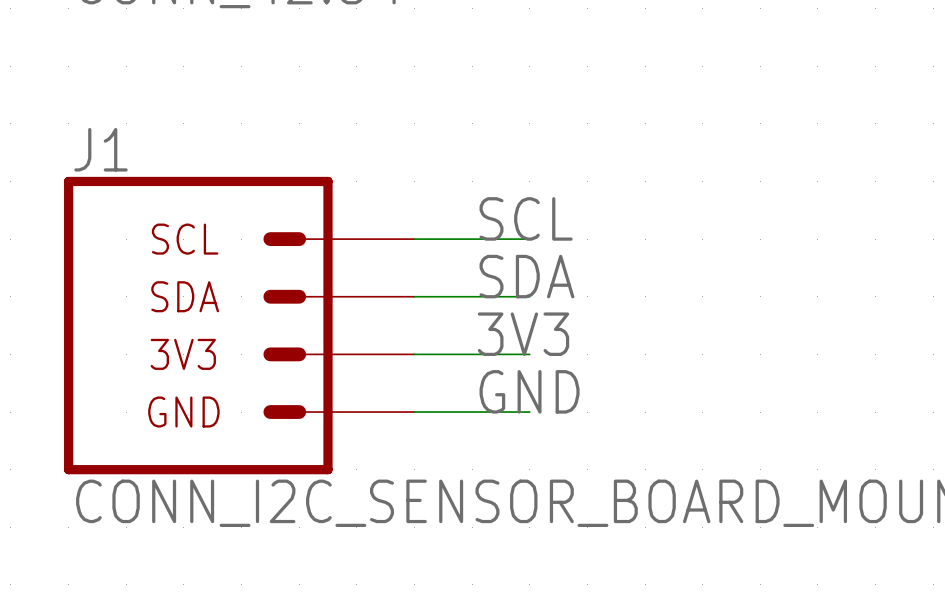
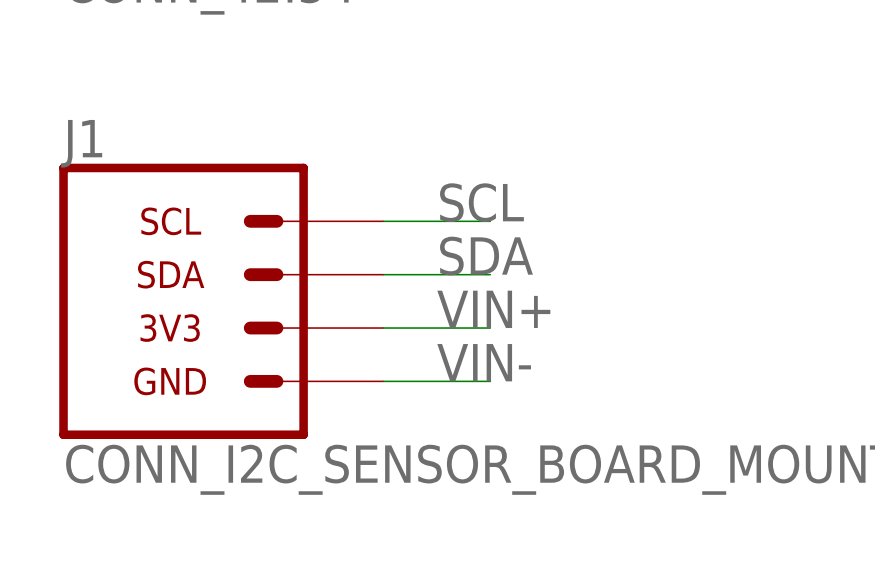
label: 3V3 (523, 334) -> VIN+ (493, 309)
label: GND (529, 391) -> VIN- (484, 362)

